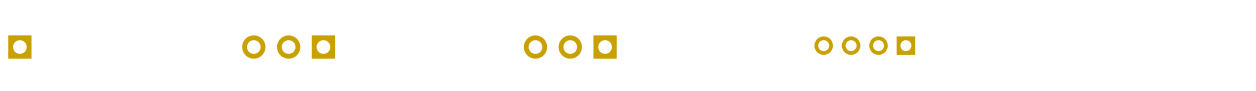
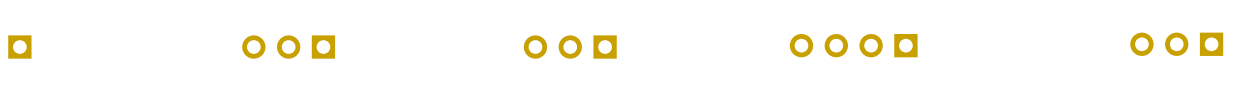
part footprint: [814, 36, 916, 55] -> [789, 34, 918, 58]
part: none -> (1176, 44)

